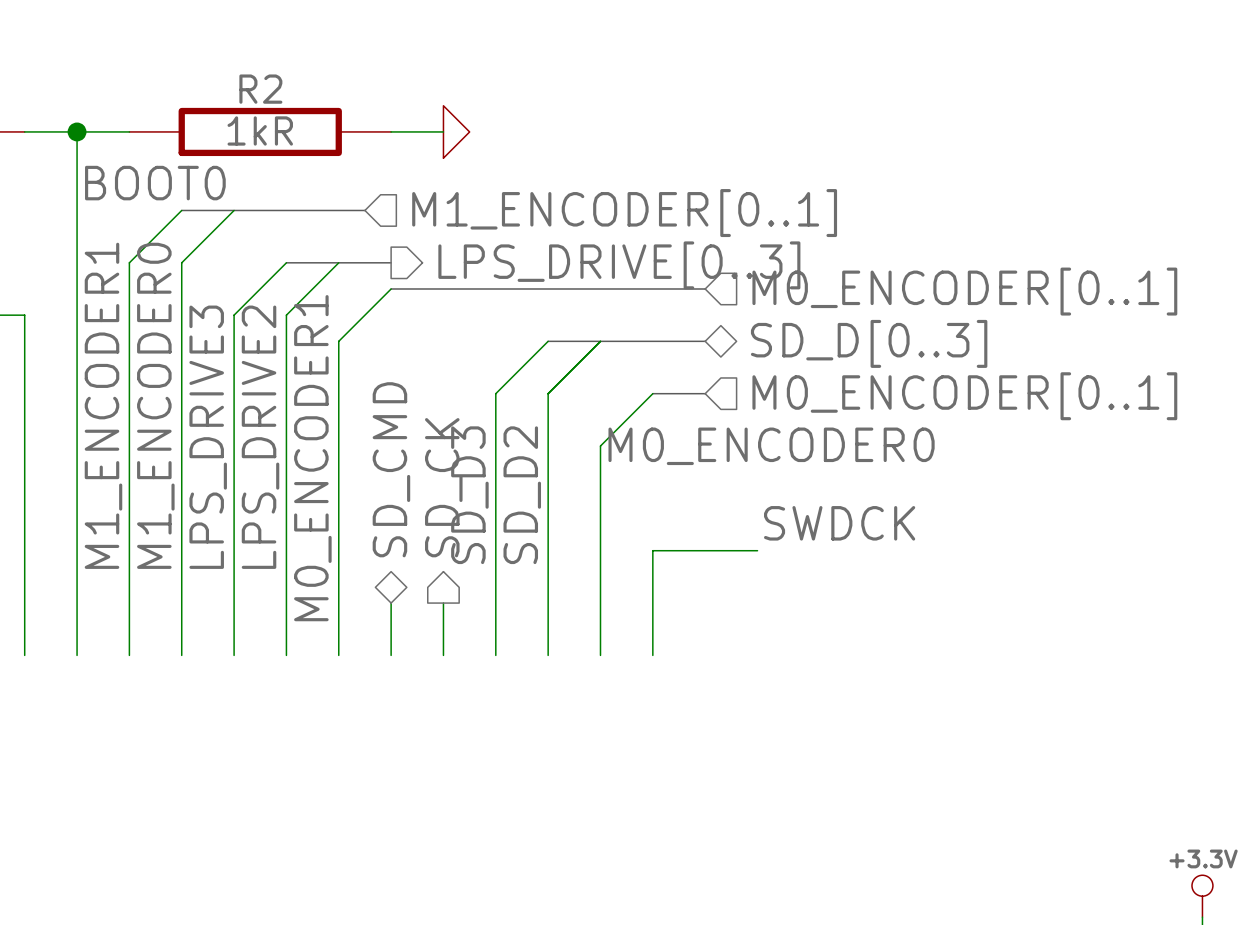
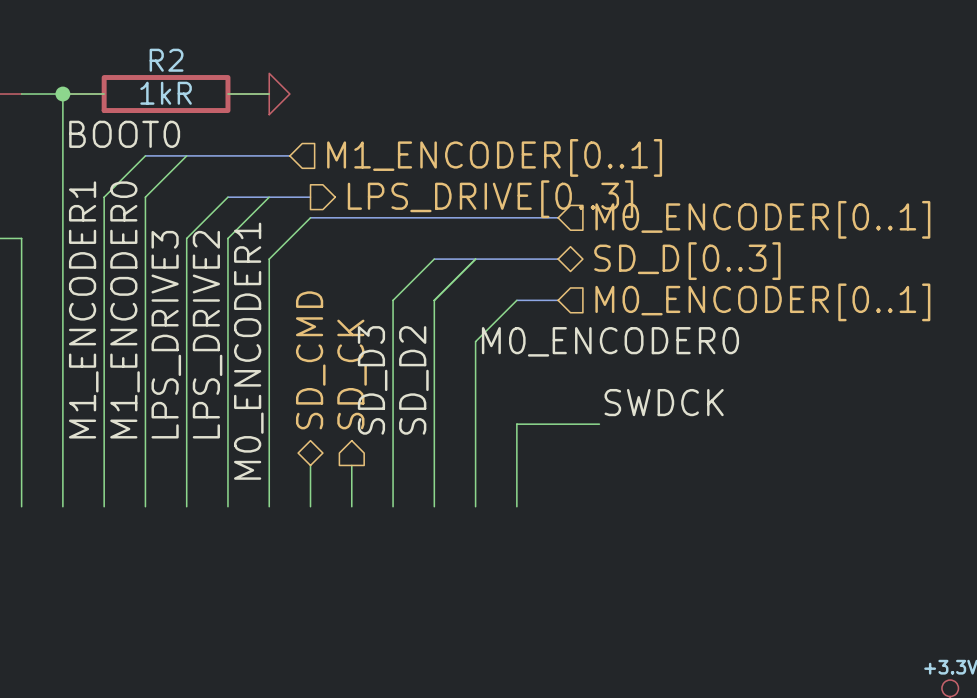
R2 position: (260, 131) -> (166, 94)
wire: (391, 131) (443, 131) -> (227, 94) (269, 94)
power symbol position: (456, 131) -> (279, 94)

